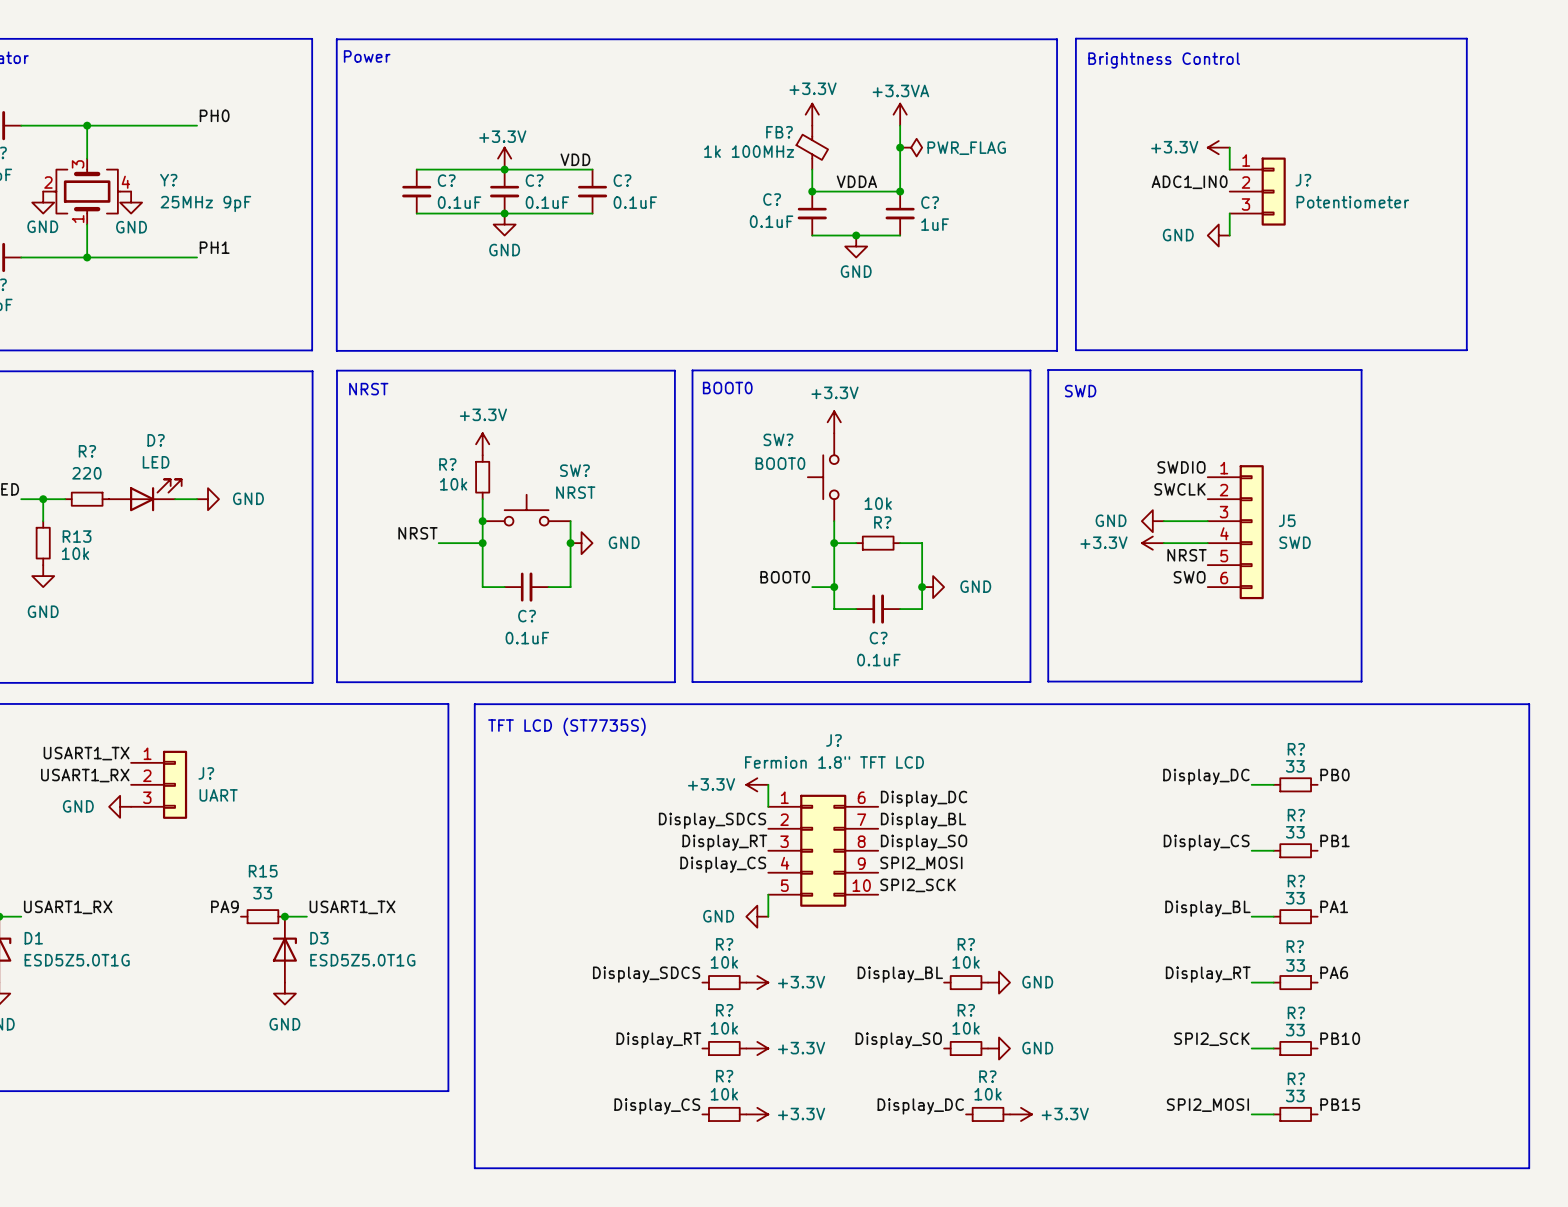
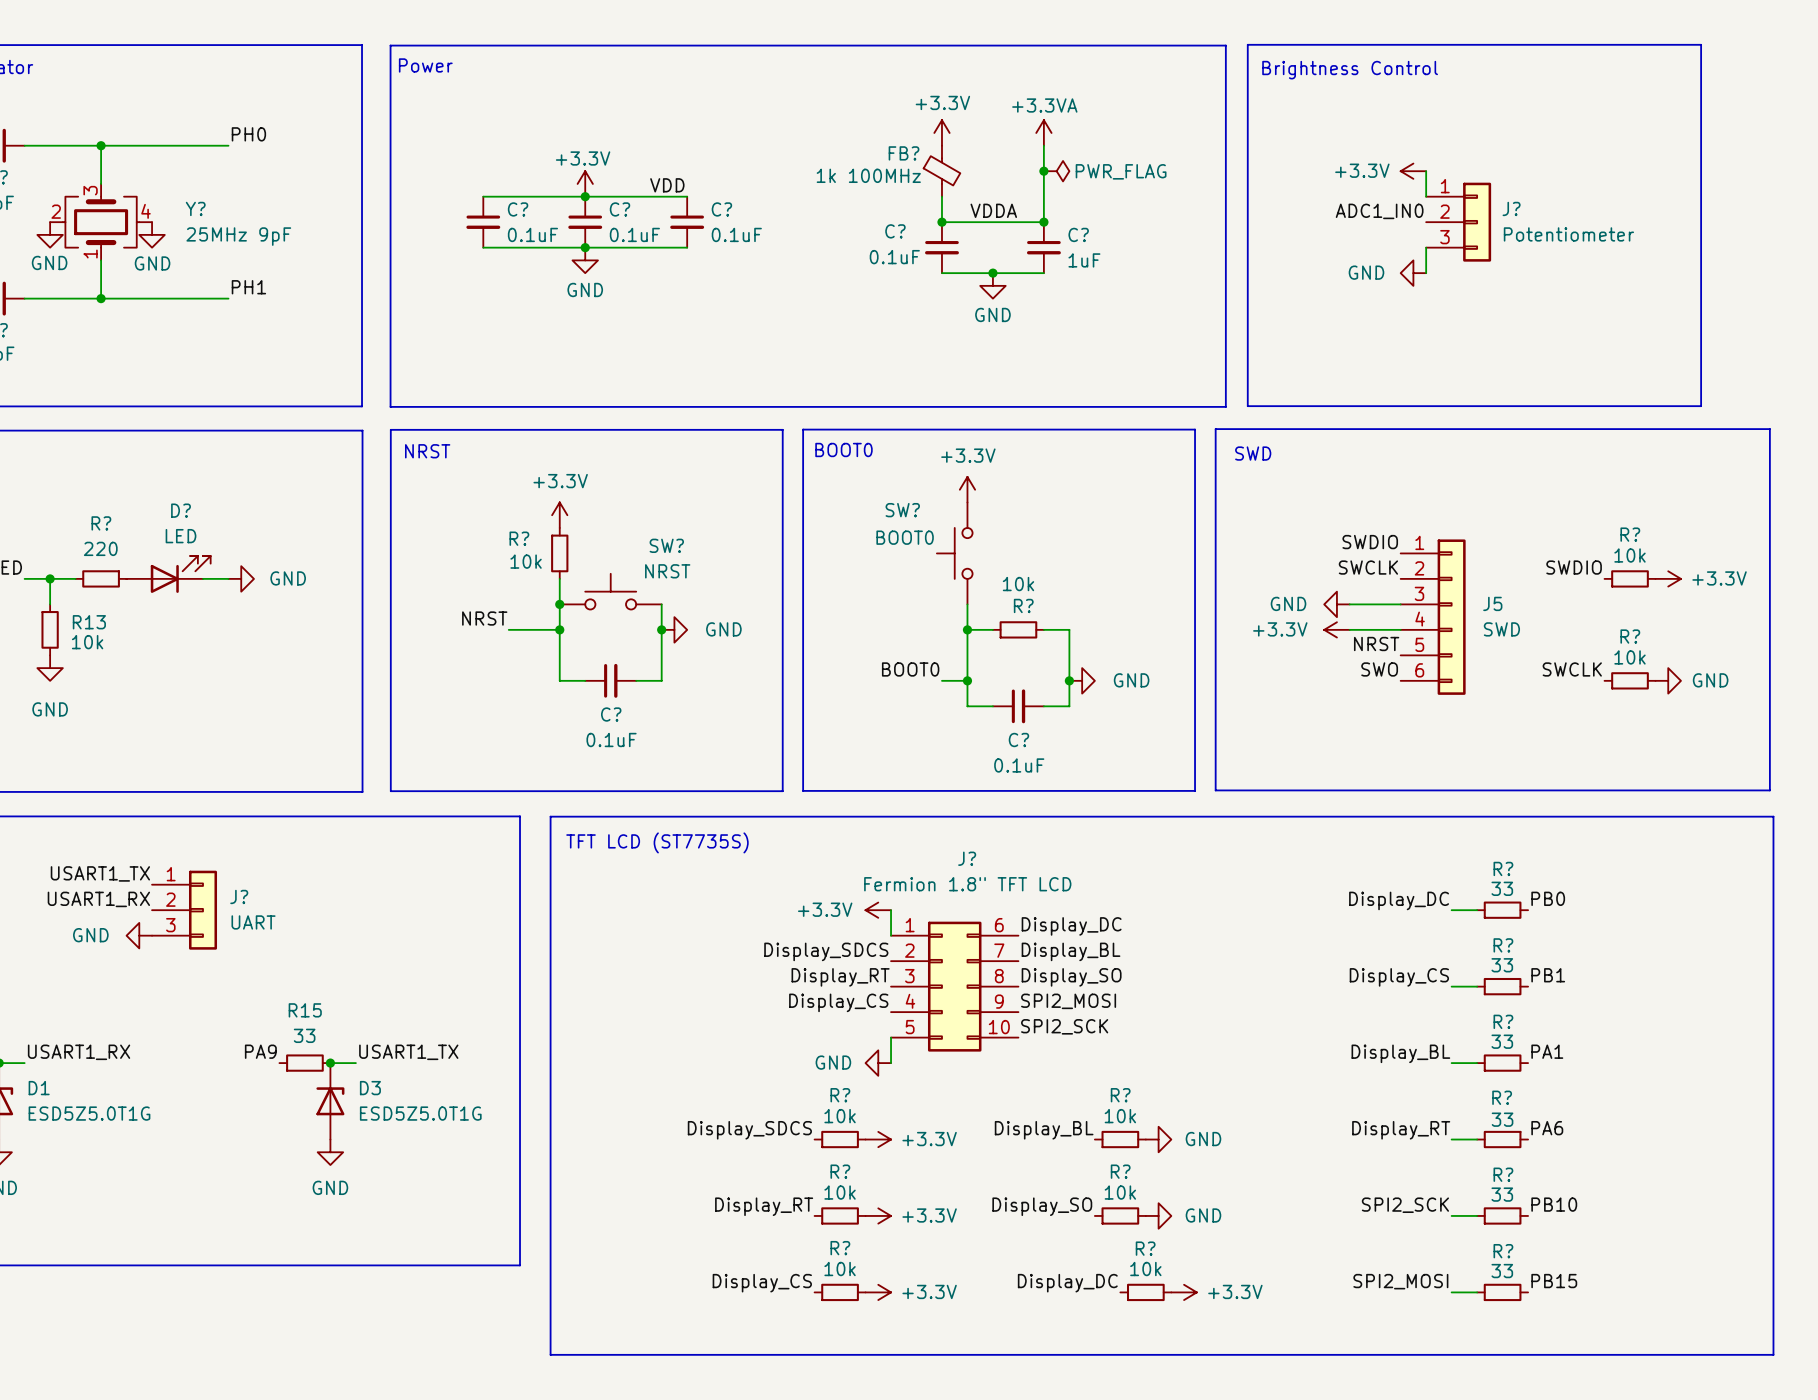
line: (1361, 369) (1361, 681) -> (1579, 429) (1769, 429) (1769, 790) (1579, 790)
label: none -> SWDIO (1574, 567)
R?: none -> 10k (1630, 578)
power symbol: none -> +3.3V (1668, 578)
label: none -> SWCLK (1572, 669)
R?: none -> 10k (1630, 680)
power symbol: none -> GND (1668, 680)

